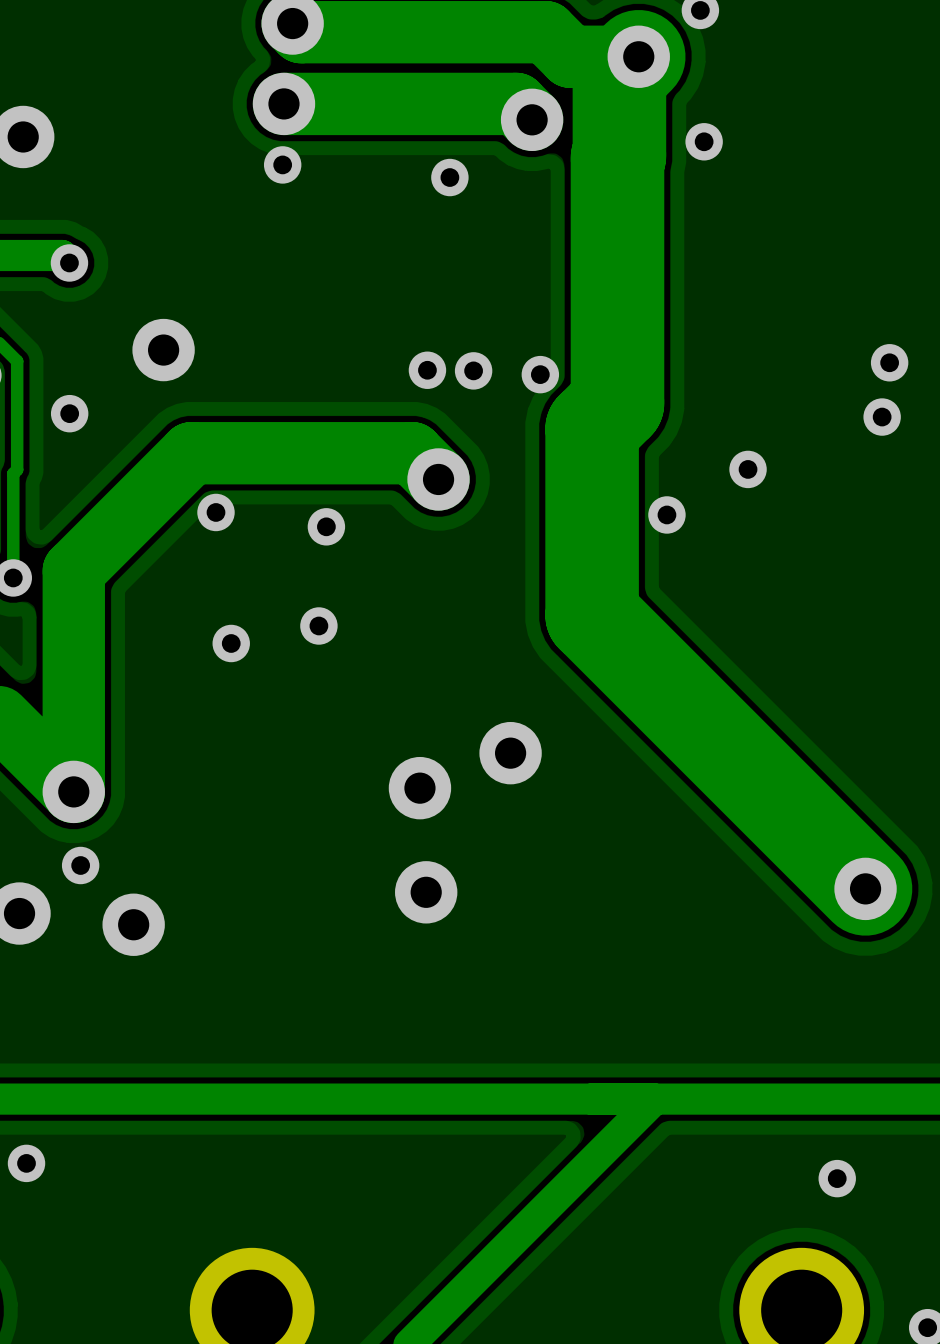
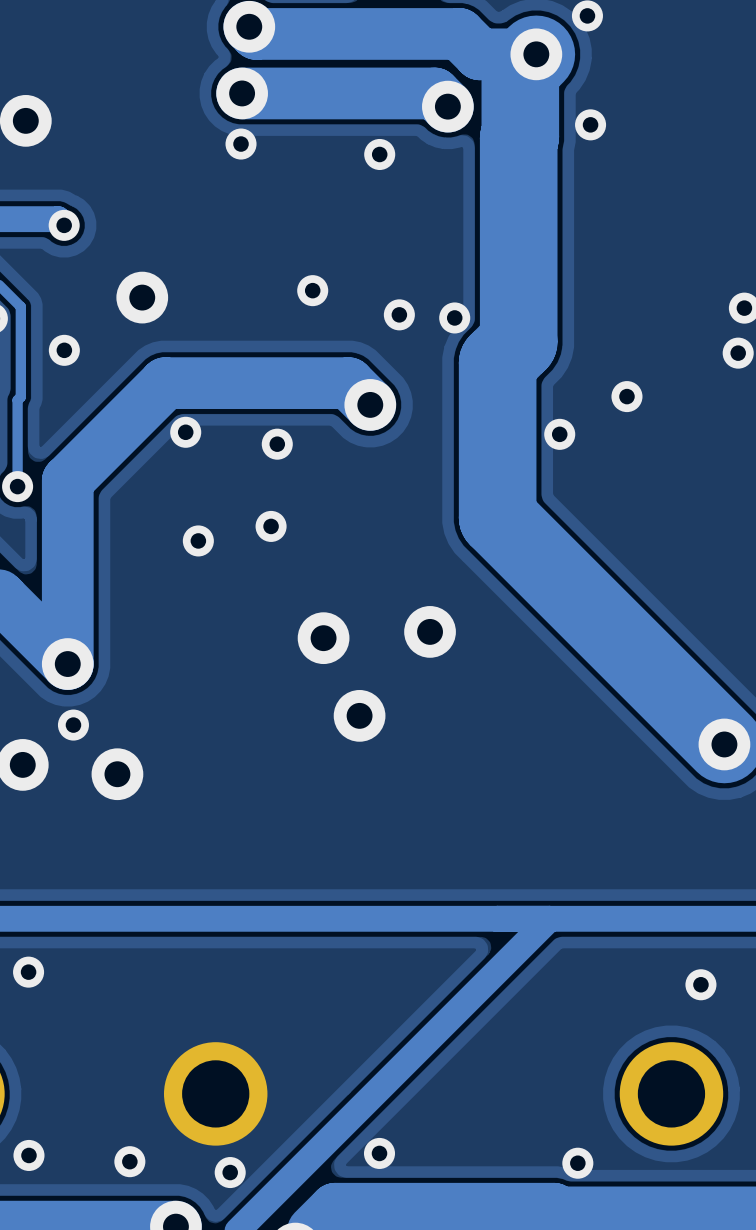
via position: (427, 370) -> (312, 290)
via position: (419, 788) -> (323, 638)
via position: (426, 892) -> (359, 715)

